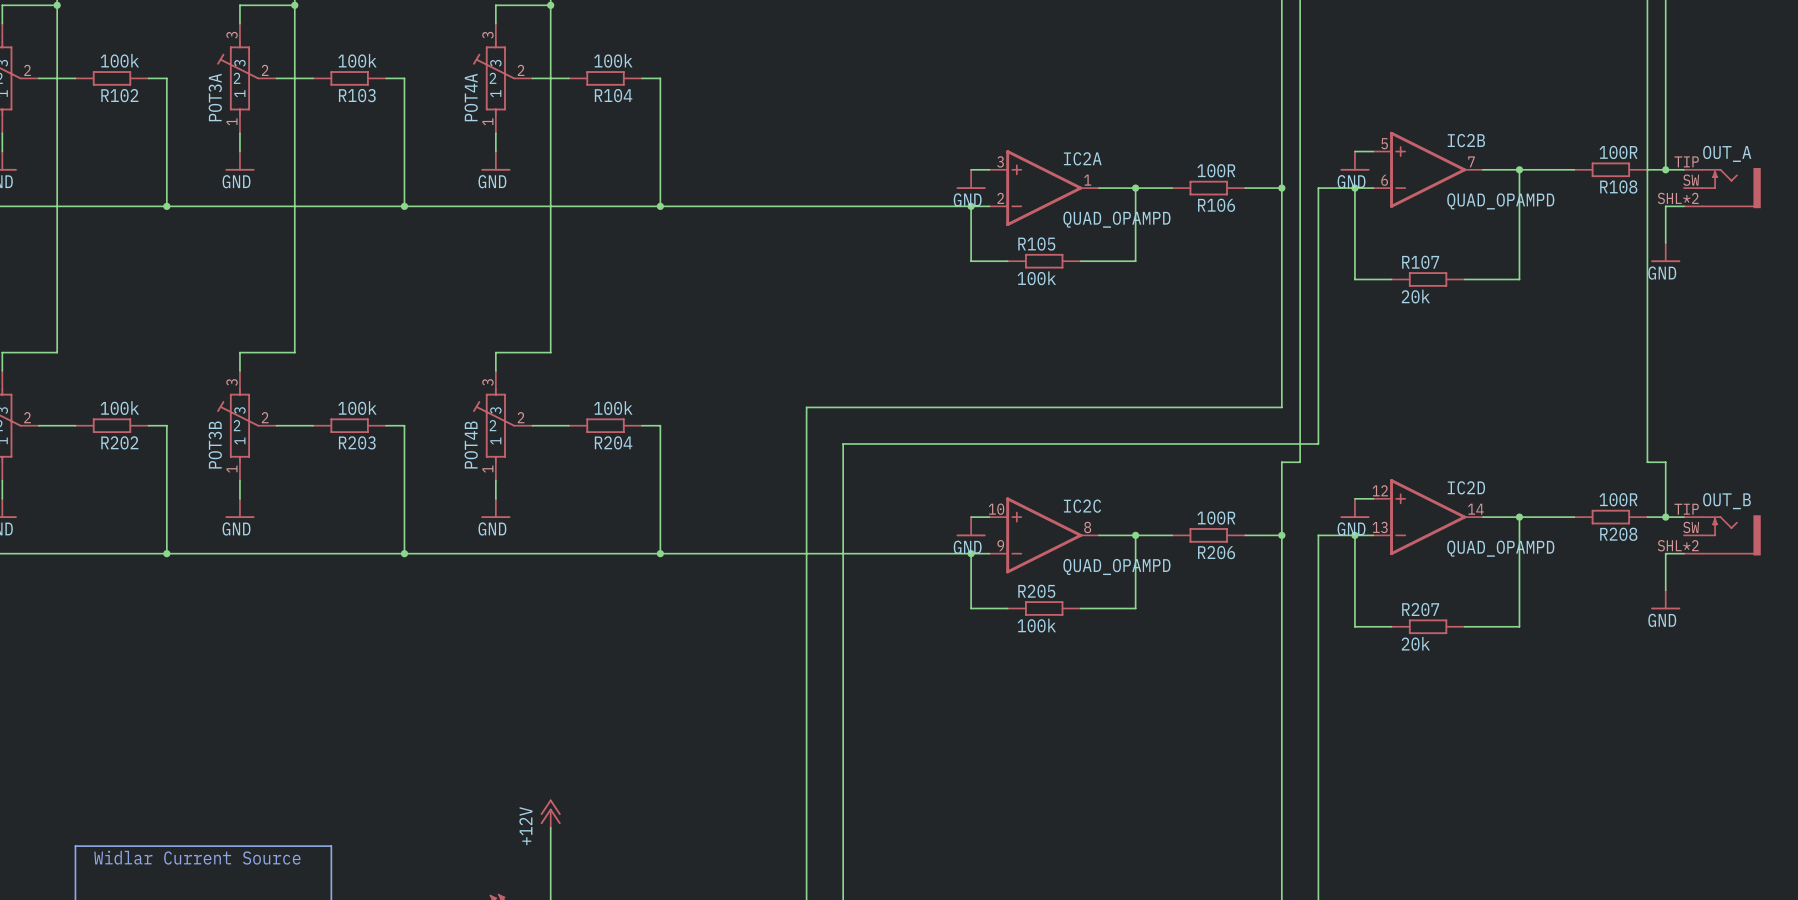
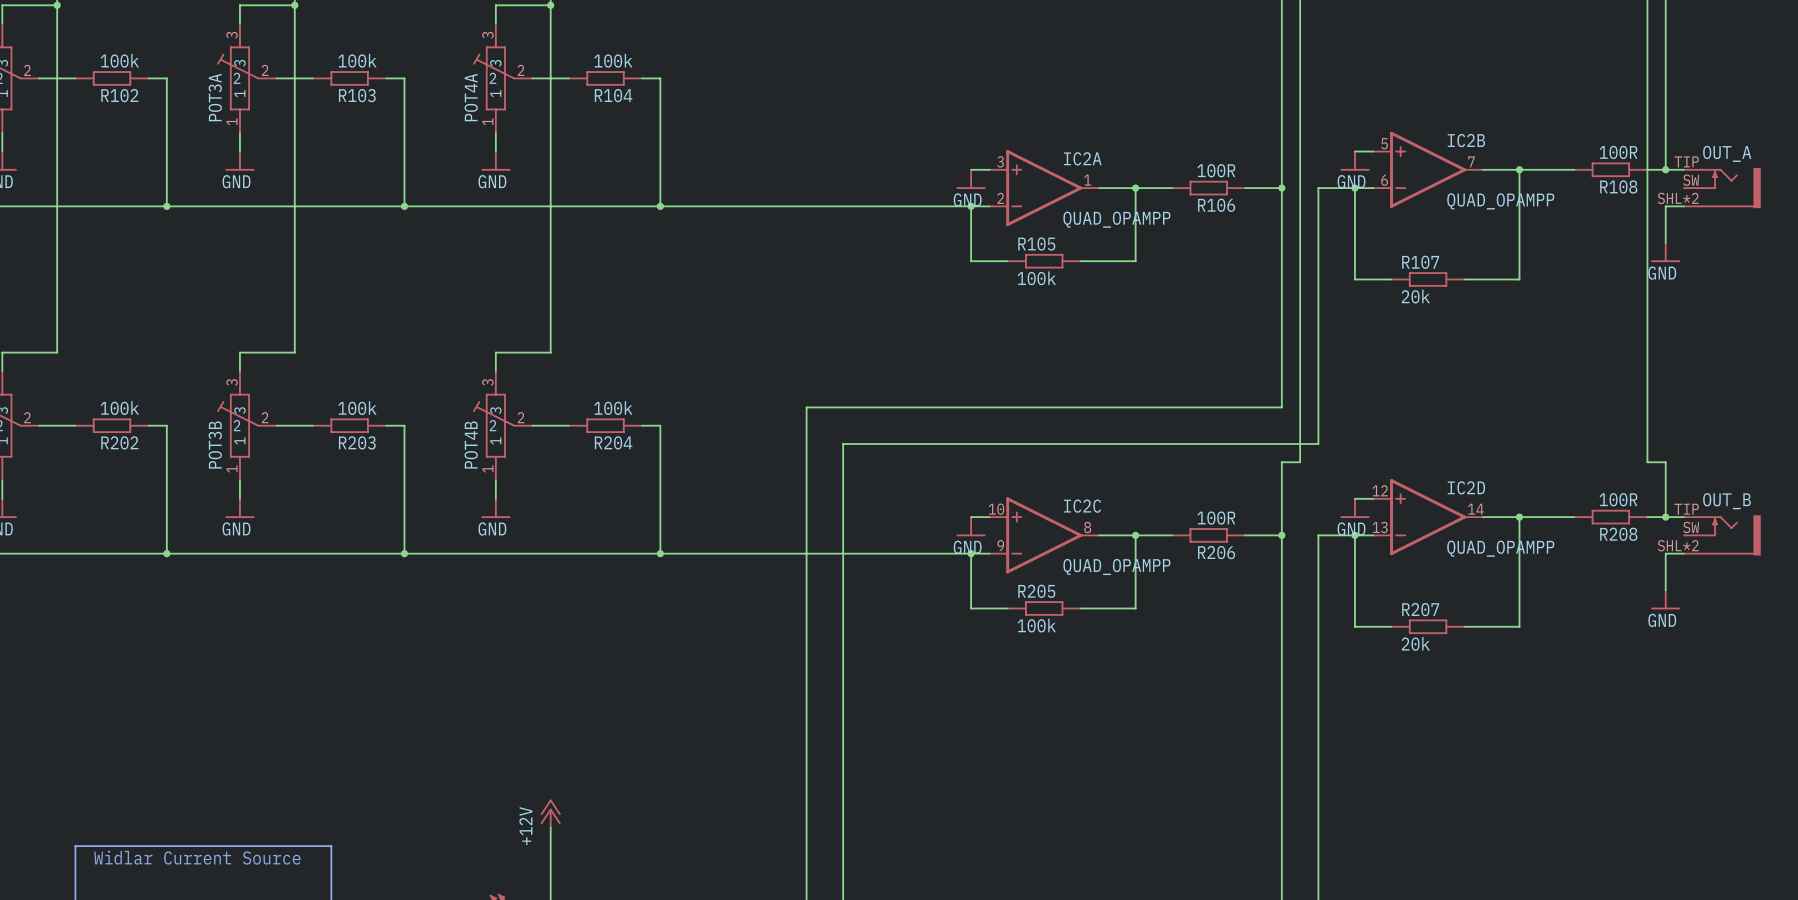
IC2B value: QUAD_OPAMPD (1500, 201) -> QUAD_OPAMPP (1500, 201)
IC2A value: QUAD_OPAMPD (1116, 219) -> QUAD_OPAMPP (1116, 219)
IC2D value: QUAD_OPAMPD (1500, 548) -> QUAD_OPAMPP (1500, 548)
IC2C value: QUAD_OPAMPD (1116, 566) -> QUAD_OPAMPP (1116, 566)

